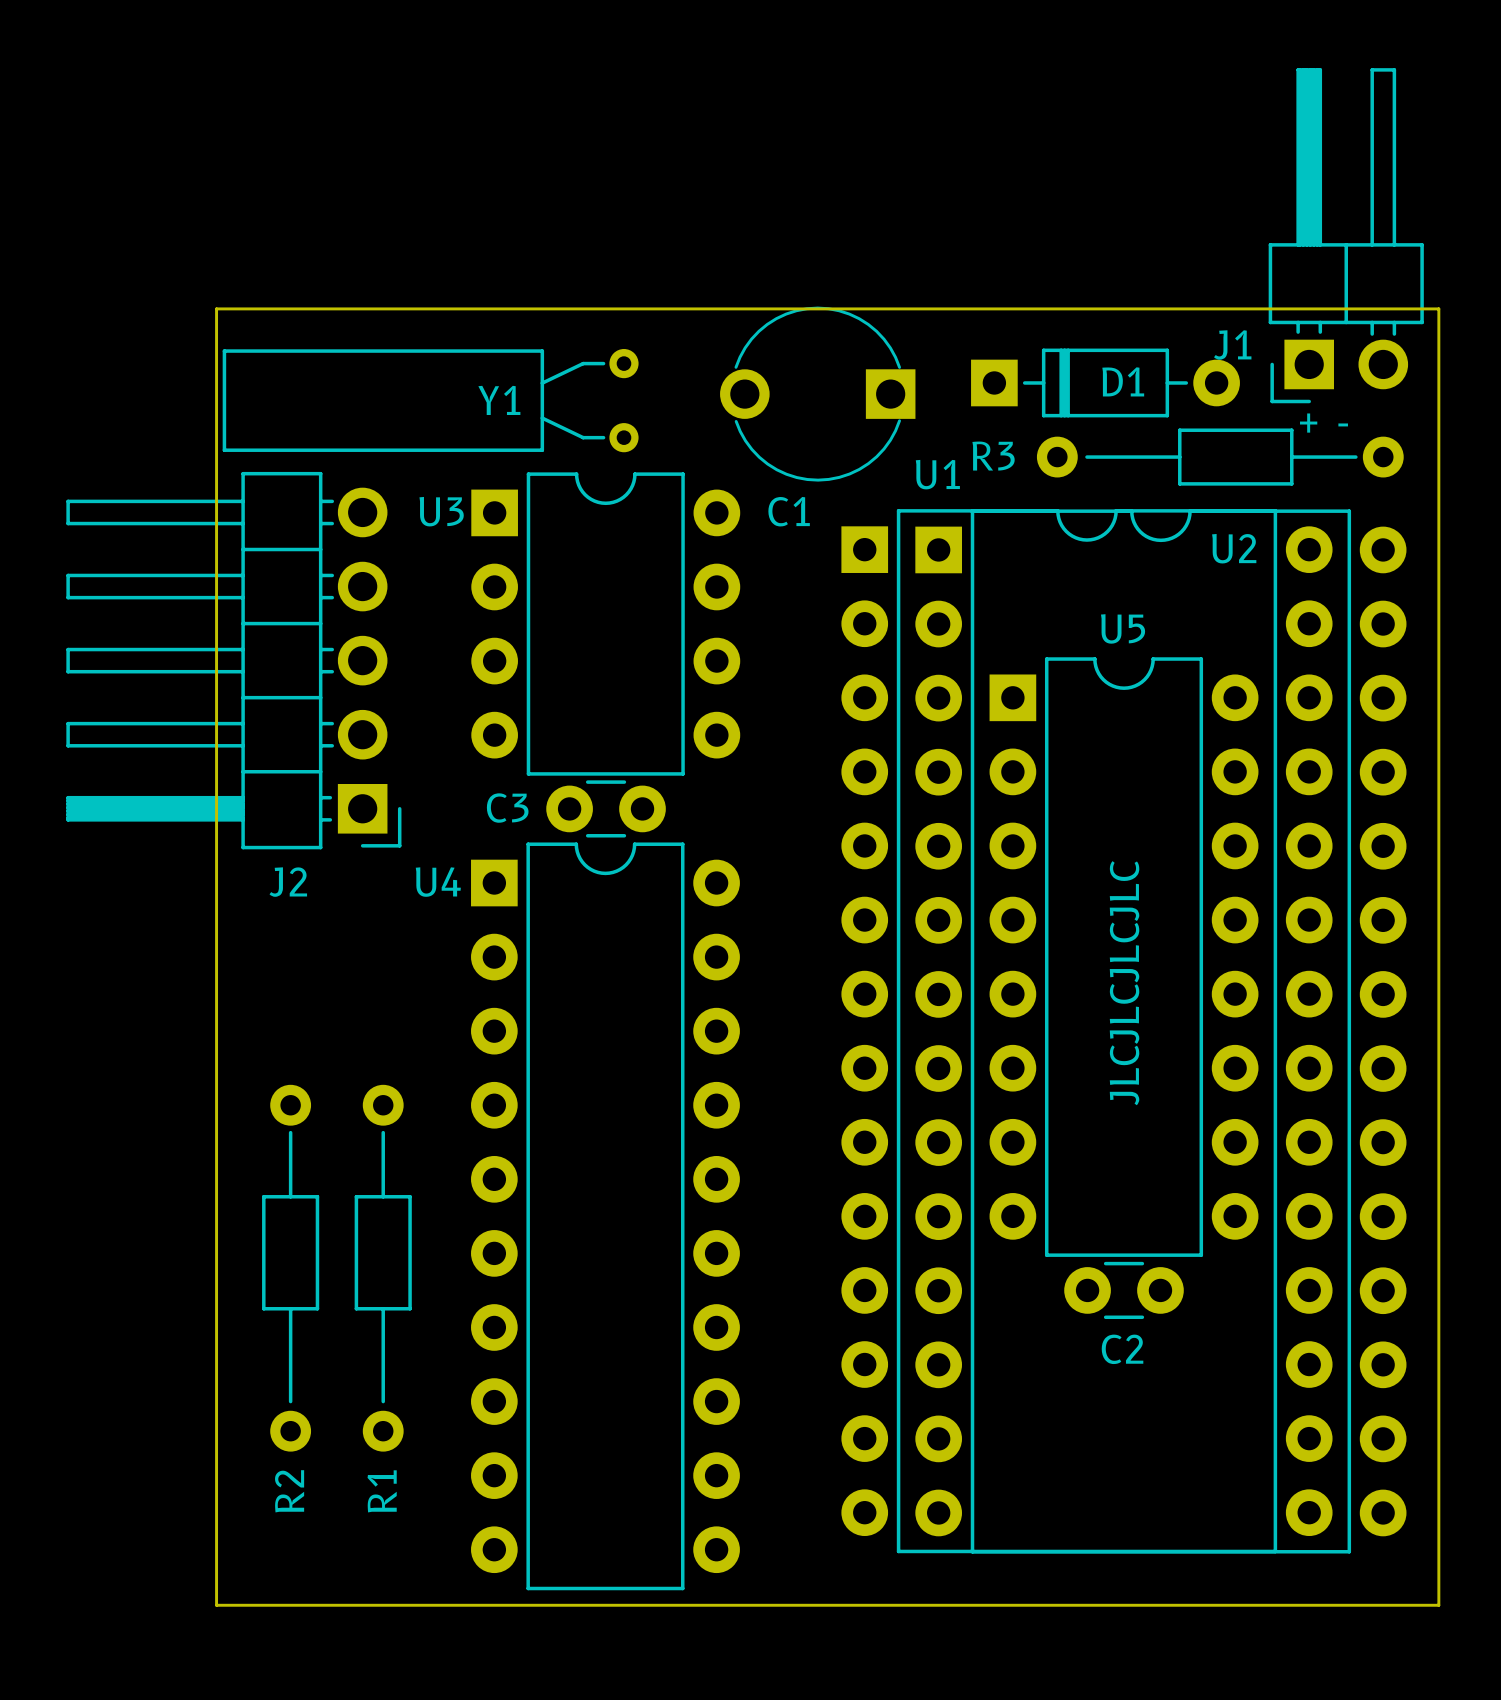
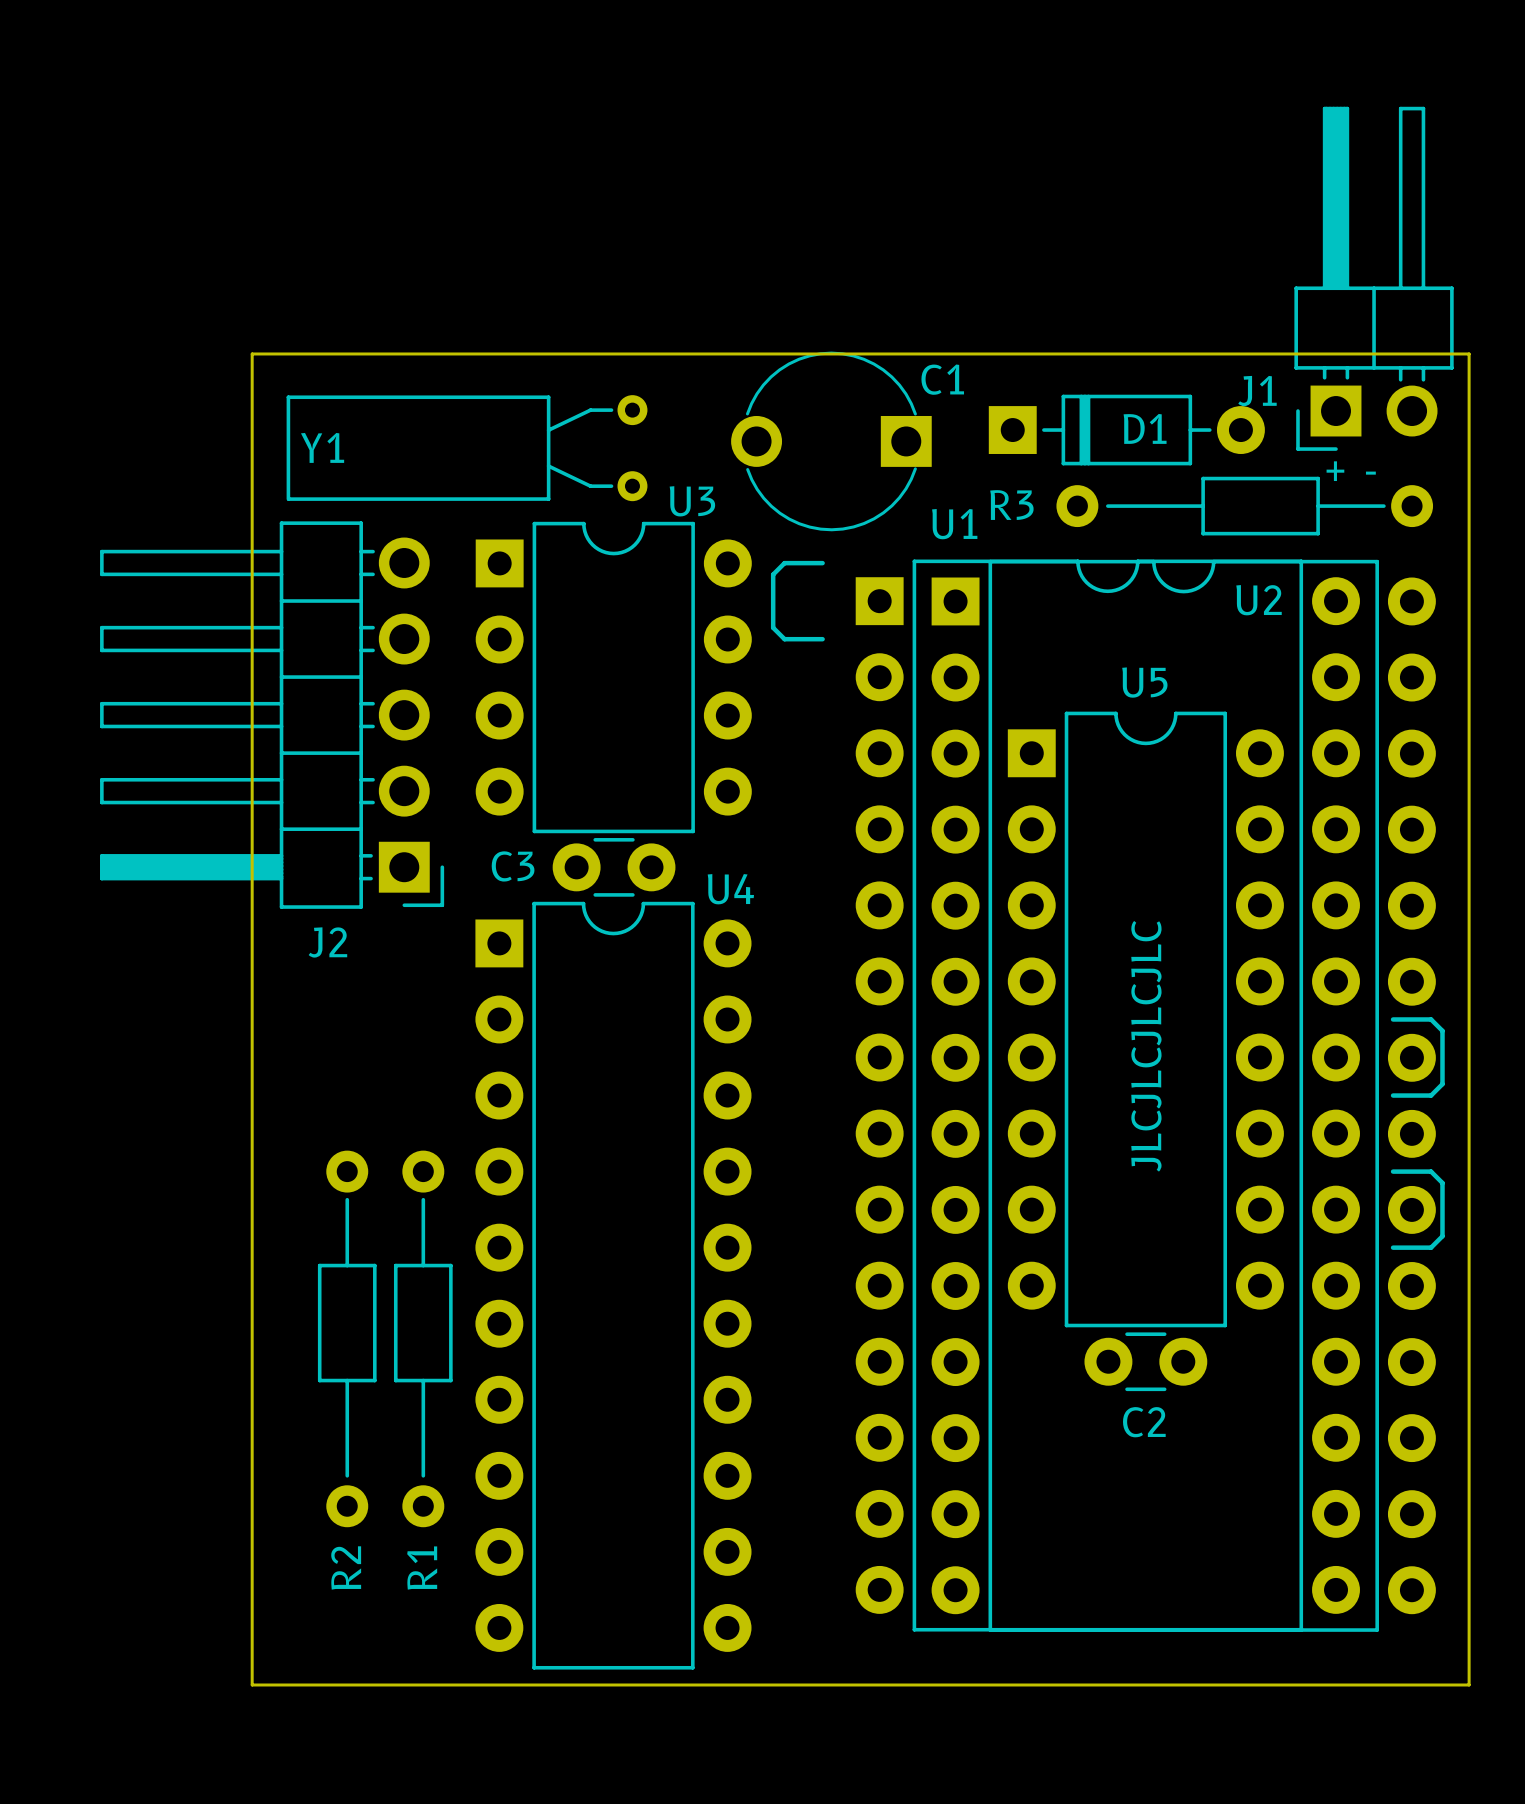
board edge: (253, 308) (216, 308) (216, 1605) (253, 1605) -> (252, 353) (252, 1684)
Y1 footprint: [222, 349, 639, 453] -> [286, 395, 648, 502]
Y1 name position: Y1 (499, 400) -> Y1 (322, 447)
U3 name position: U3 (441, 511) -> U3 (692, 501)
C1 name position: C1 (789, 511) -> C1 (942, 379)
line: none -> (822, 563) (784, 563) (773, 574) (773, 627) (784, 639) (822, 639)
J2 position: (233, 660) -> (272, 715)
U4 name position: U4 (438, 882) -> U4 (730, 889)
line: none -> (1393, 1019) (1431, 1019) (1442, 1030) (1442, 1084) (1431, 1095) (1393, 1095)
line: none -> (1393, 1171) (1431, 1171) (1442, 1183) (1442, 1236) (1431, 1247) (1393, 1247)
R2 position: (290, 1268) -> (347, 1338)
R1 position: (383, 1268) -> (423, 1338)

